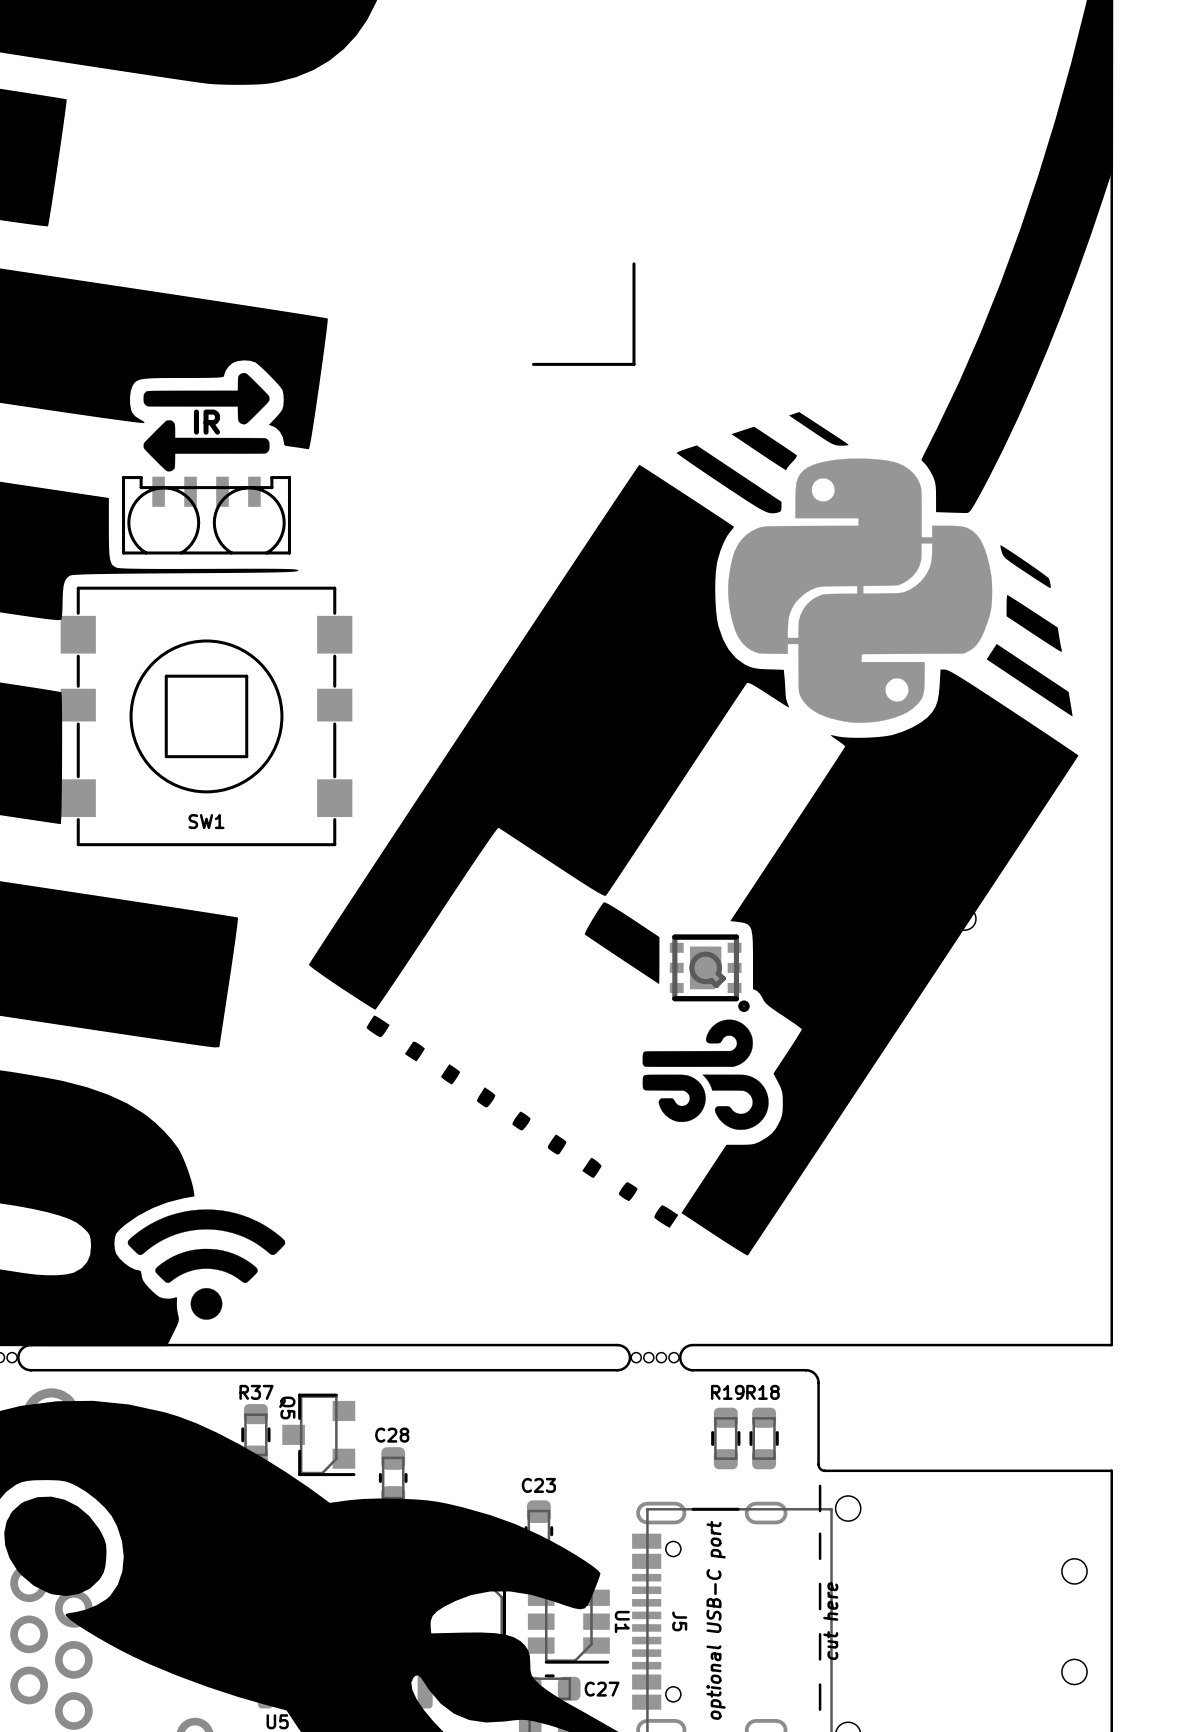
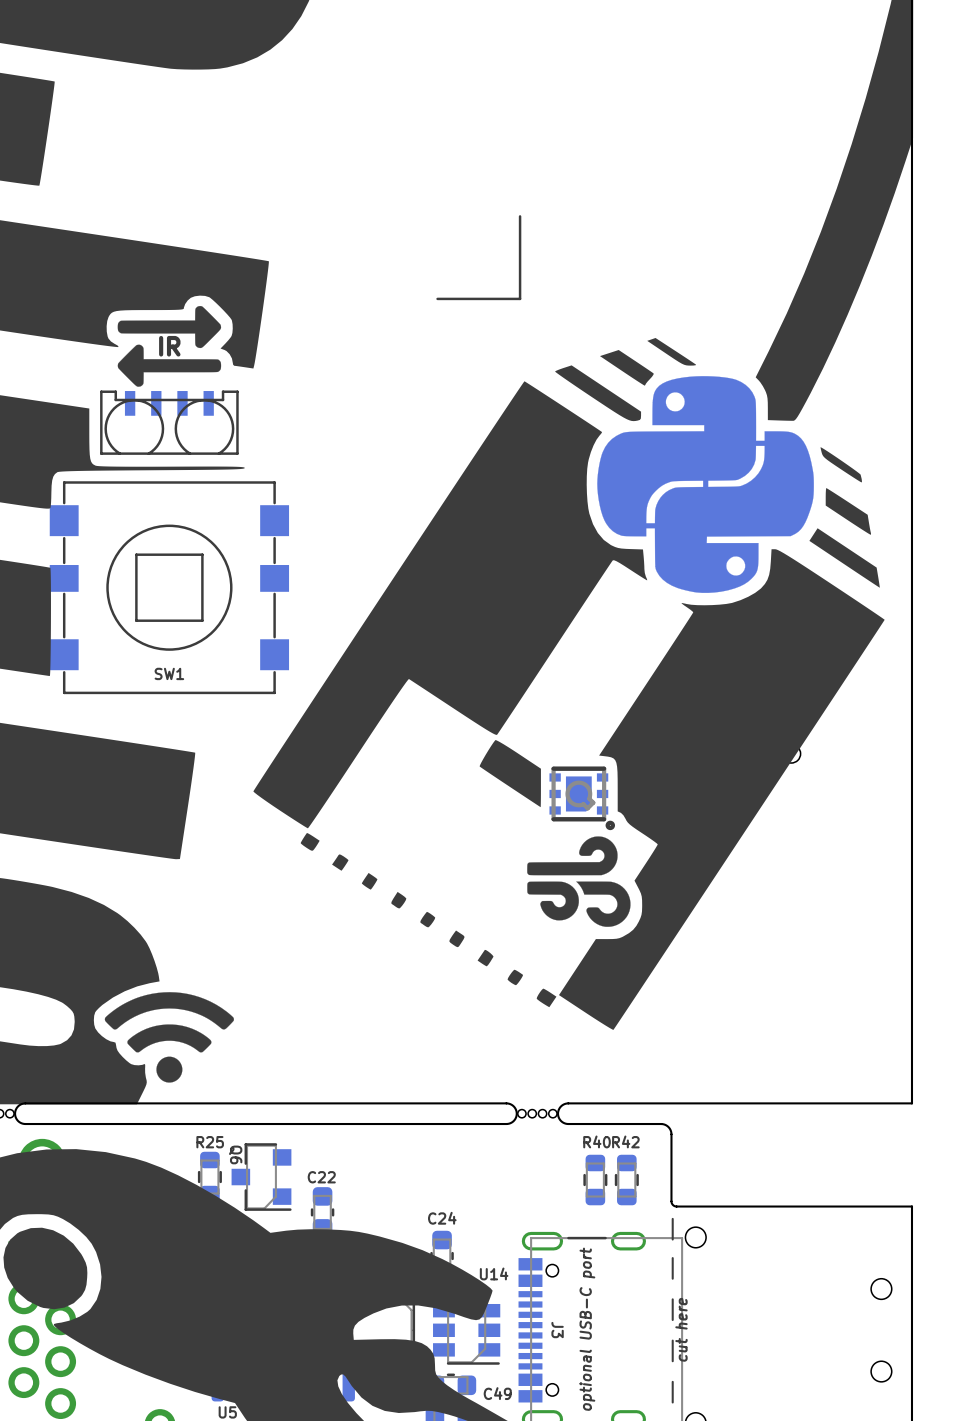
R37 name: R37 (256, 1392) -> R25 (210, 1142)
R19 name: R19 (727, 1392) -> R40 (597, 1141)
R18 name: R18 (762, 1392) -> R42 (625, 1141)
Q5 name: Q5 (287, 1407) -> Q6 (235, 1154)
C28 name: C28 (392, 1435) -> C22 (321, 1177)
C23 name: C23 (538, 1485) -> C24 (442, 1218)
U1 name: U1 (622, 1621) -> U14 (494, 1273)
J5 name: J5 (679, 1621) -> J3 (557, 1330)
C27 name: C27 (602, 1689) -> C49 (497, 1393)

